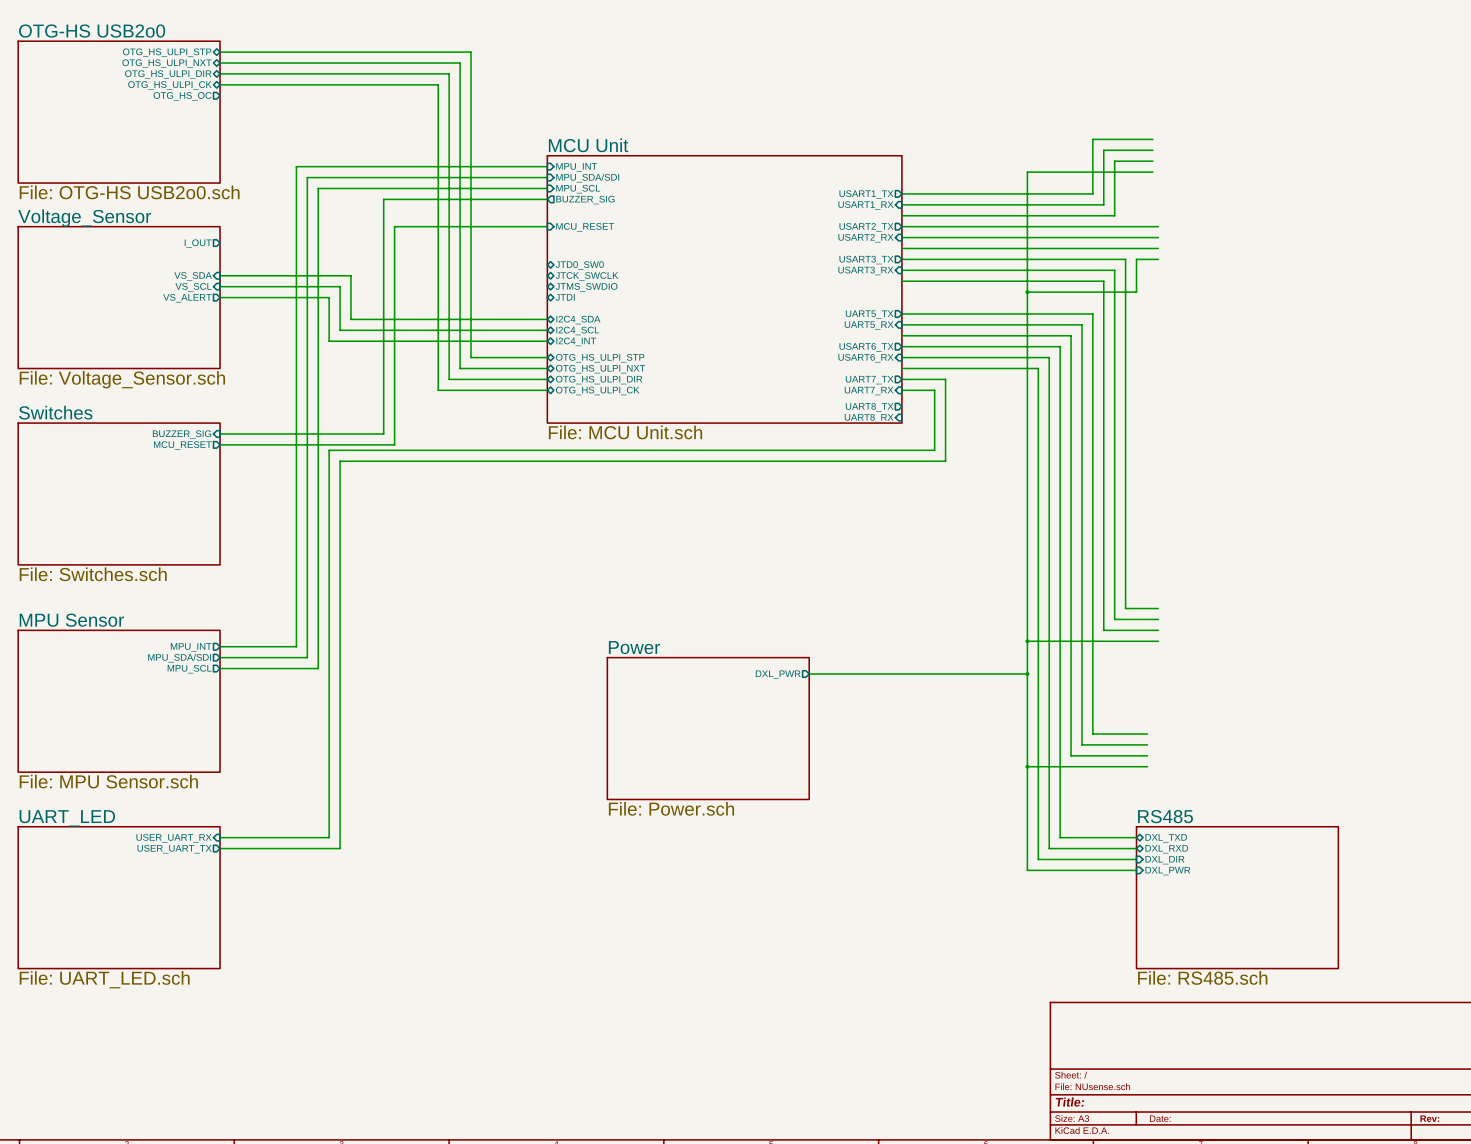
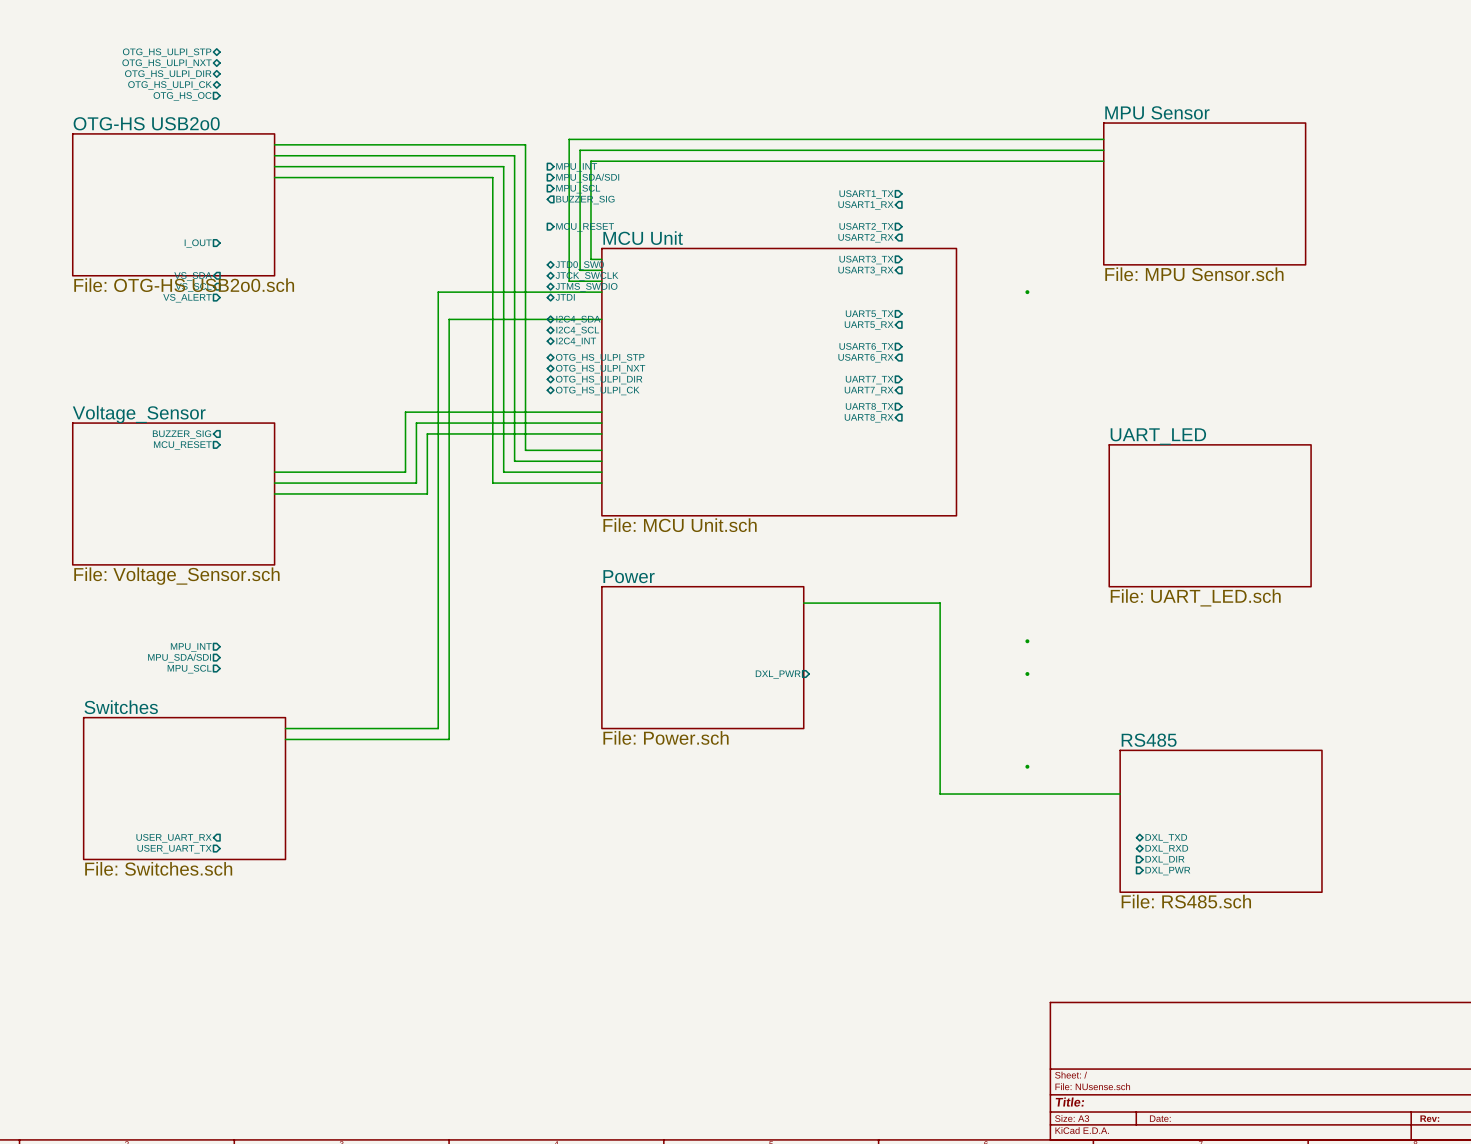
wire: (220, 52) (470, 52) (470, 357) (547, 357) -> none
wire: (220, 63) (460, 63) (460, 368) (547, 368) -> none
wire: (220, 73) (449, 73) (449, 319) (350, 319) (350, 275) (220, 275) -> none
wire: (220, 84) (438, 84) (438, 292) -> (601, 292) (438, 292)
sheet OTG-HS USB2o0 position: (119, 112) -> (173, 204)
wire: (1092, 139) (1092, 193) (901, 193) -> (1092, 139) (569, 139) (569, 281) (601, 281)
wire: (1103, 139) (1152, 139) -> none
wire: none -> (1103, 150) (580, 150) (580, 270) (601, 270)
wire: (1152, 150) (1103, 150) (1103, 204) (901, 204) -> none
wire: none -> (1103, 161) (590, 161) (590, 259) (601, 259)
wire: (1152, 161) (1114, 161) (1114, 215) (901, 215) -> none
wire: (296, 166) (296, 646) (220, 646) -> (296, 166) (274, 166)
wire: (503, 166) (547, 166) -> (503, 166) (503, 472) (601, 472)
wire: (1152, 172) (1027, 172) (1027, 870) (1136, 870) -> none
wire: (307, 177) (307, 657) (220, 657) -> (307, 177) (274, 177)
wire: (492, 177) (547, 177) -> (492, 177) (492, 483) (601, 483)
wire: (547, 188) (318, 188) (318, 668) (220, 668) -> none
sheet MPU Sensor: none -> File: MPU Sensor.sch (1204, 193)
wire: (547, 199) (383, 199) (383, 433) (220, 433) -> none
wire: (547, 226) (394, 226) (394, 444) (220, 444) -> none
wire: (901, 226) (1158, 226) -> none
wire: (901, 237) (1158, 237) -> none
wire: (901, 248) (1158, 248) -> none
wire: (901, 259) (1125, 259) (1125, 608) (1158, 608) -> none
wire: (1158, 259) (1136, 259) (1136, 292) (1027, 292) -> none
wire: (901, 270) (1114, 270) (1114, 619) (1158, 619) -> none
wire: (901, 281) (1103, 281) (1103, 630) (1158, 630) -> none
wire: (220, 286) (340, 286) (340, 330) (547, 330) -> none
sheet MCU Unit: File: MCU Unit.sch (724, 289) -> none
sheet Voltage_Sensor: File: Voltage_Sensor.sch (119, 297) -> none
wire: (220, 297) (329, 297) (329, 341) (547, 341) -> none
wire: (901, 313) (1092, 313) (1092, 734) (1147, 734) -> none
wire: none -> (547, 319) (601, 319)
wire: (901, 324) (1081, 324) (1081, 744) (1147, 744) -> none
wire: (901, 335) (1071, 335) (1071, 755) (1147, 755) -> none
wire: (901, 346) (1060, 346) (1060, 837) (1136, 837) -> none
wire: (901, 357) (1049, 357) (1049, 848) (1136, 848) -> none
wire: (901, 368) (1038, 368) (1038, 859) (1136, 859) -> none
wire: (449, 379) (547, 379) -> (449, 379) (449, 739) (285, 739)
wire: (901, 379) (945, 379) (945, 461) (601, 461) -> none
sheet MCU Unit: none -> File: MCU Unit.sch (779, 382)
wire: (438, 390) (547, 390) -> (438, 390) (438, 728) (285, 728)
wire: (901, 390) (934, 390) (934, 450) (601, 450) -> none
wire: none -> (601, 412) (405, 412) (405, 472) (274, 472)
wire: none -> (601, 423) (416, 423) (416, 483) (274, 483)
wire: none -> (601, 433) (427, 433) (427, 493) (274, 493)
wire: (525, 450) (329, 450) (329, 837) (220, 837) -> (525, 450) (525, 144) (274, 144)
wire: (514, 461) (340, 461) (340, 848) (220, 848) -> (514, 461) (514, 155) (274, 155)
sheet Switches: File: Switches.sch (119, 493) -> none
sheet Voltage_Sensor: none -> File: Voltage_Sensor.sch (173, 493)
sheet UART_LED: none -> File: UART_LED.sch (1210, 515)
wire: none -> (803, 603) (940, 603) (940, 794) (1120, 794)
wire: (1027, 641) (1158, 641) -> none
wire: (809, 673) (1027, 673) -> none
sheet MPU Sensor: File: MPU Sensor.sch (119, 701) -> none
sheet Power position: (708, 728) -> (702, 657)
wire: (1027, 766) (1147, 766) -> none
sheet Switches: none -> File: Switches.sch (184, 788)
sheet UART_LED: File: UART_LED.sch (119, 897) -> none
sheet RS485 position: (1237, 897) -> (1221, 821)

